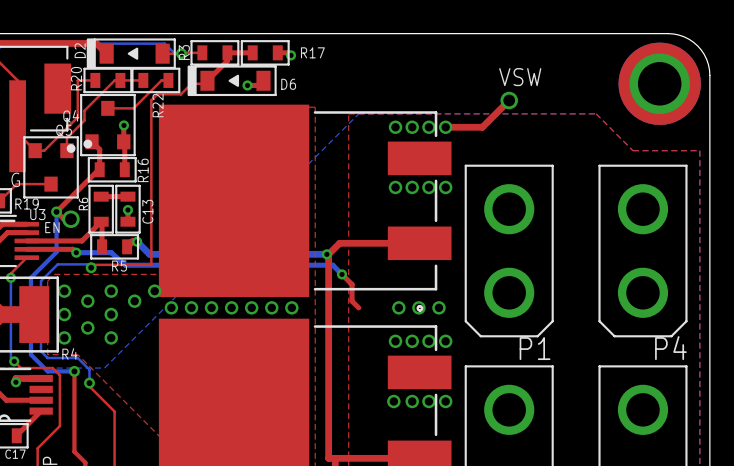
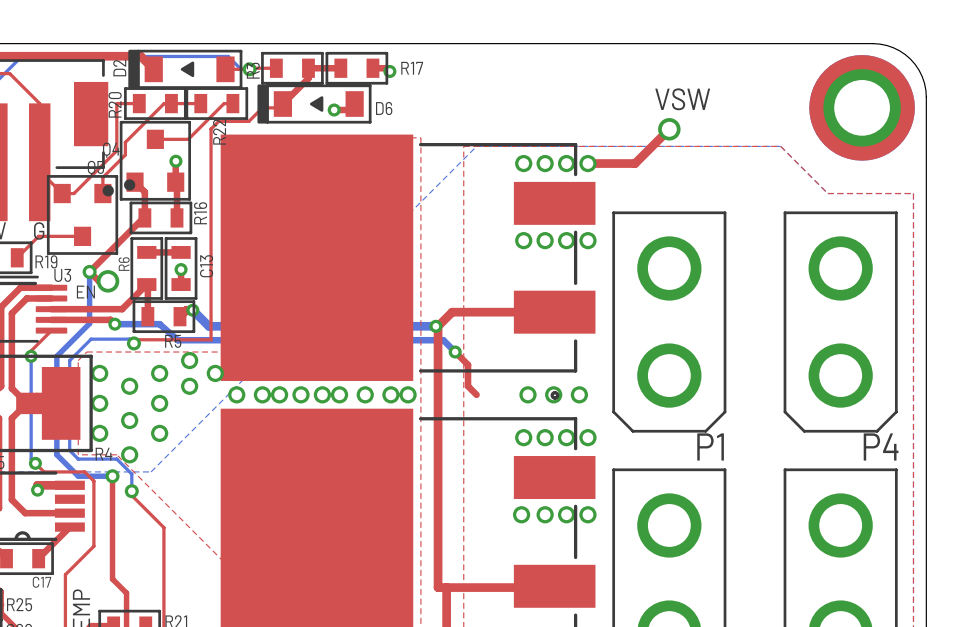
via: none -> (189, 360)
via: none -> (279, 394)
via: (211, 307) -> none
via: none -> (300, 394)
via: (231, 307) -> none
via: none -> (322, 394)
via: none -> (408, 394)
via: none -> (129, 454)

